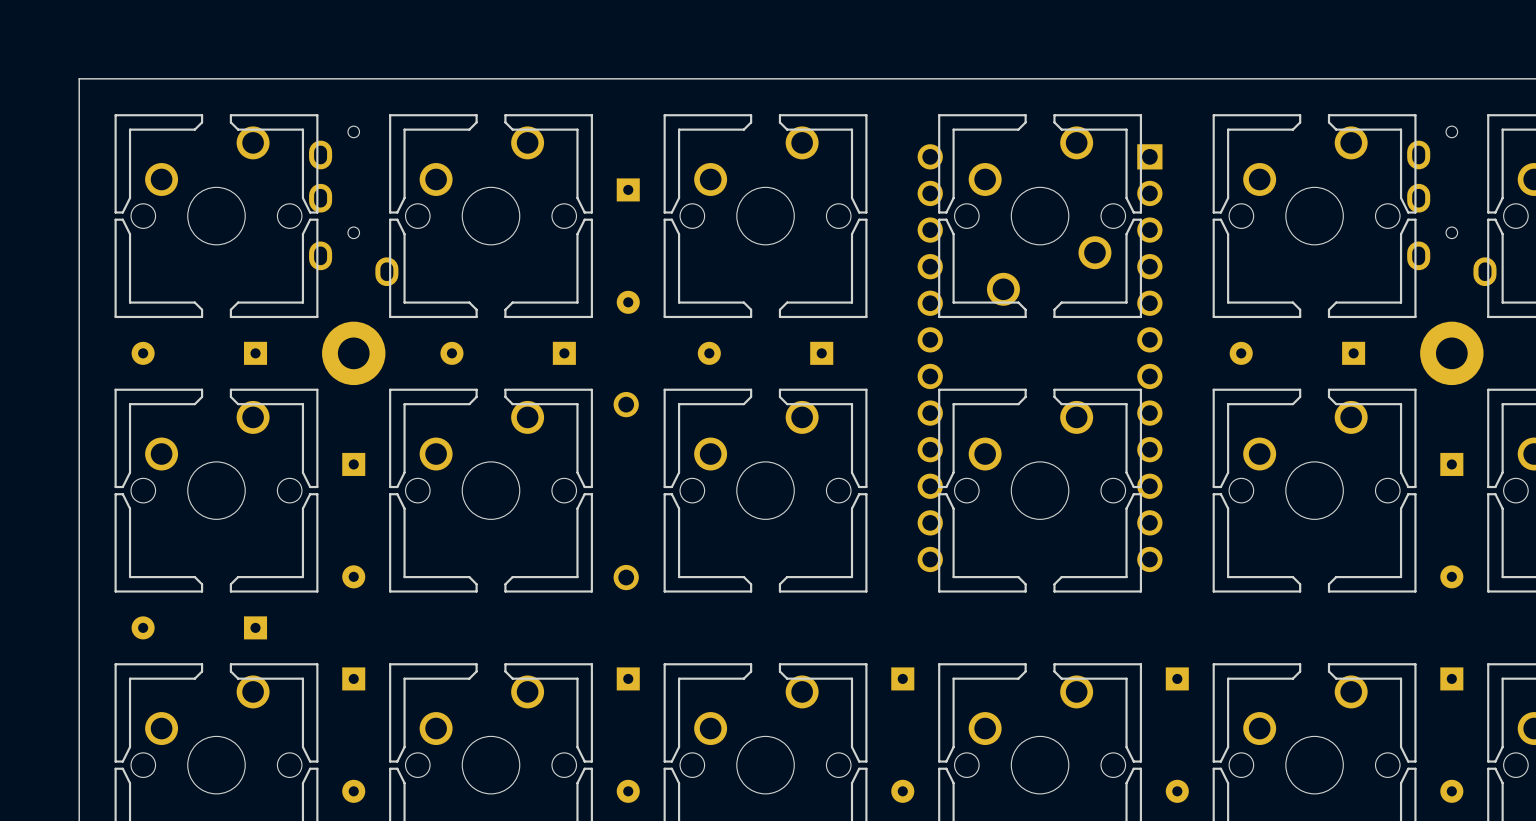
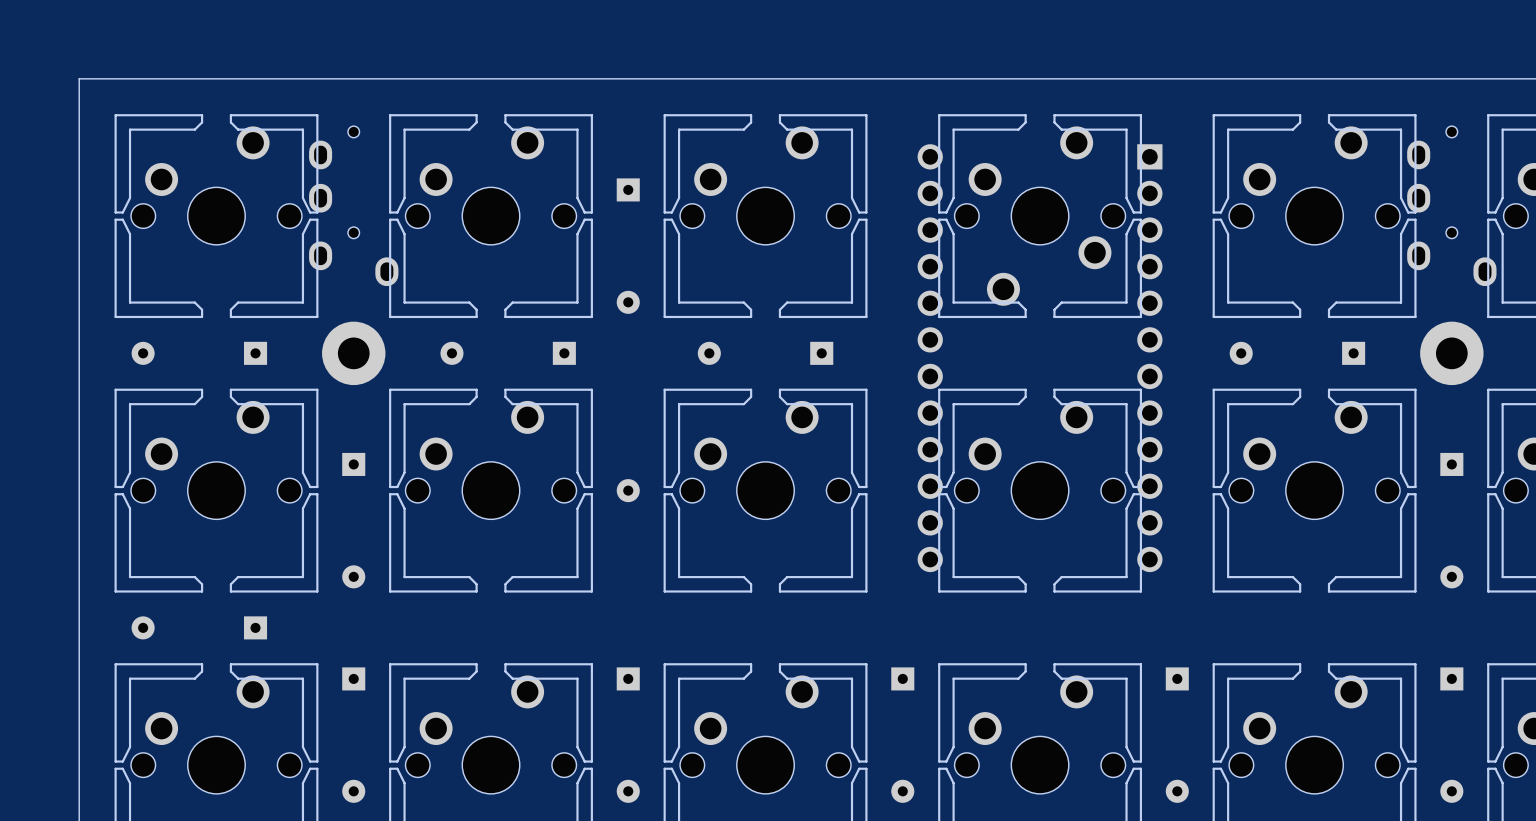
part: (626, 404) -> none
part: none -> (628, 490)
part: (626, 577) -> none

